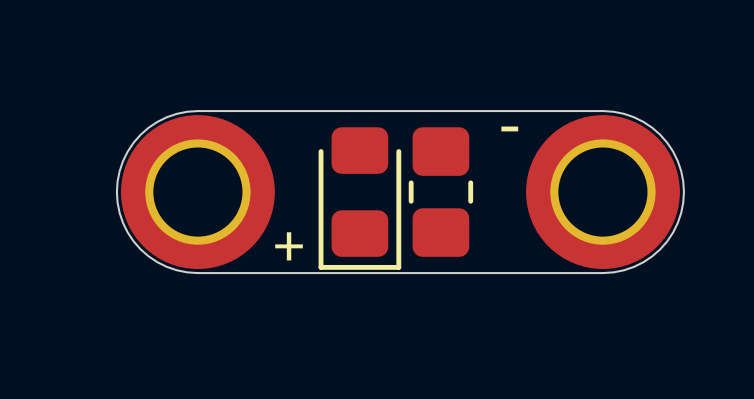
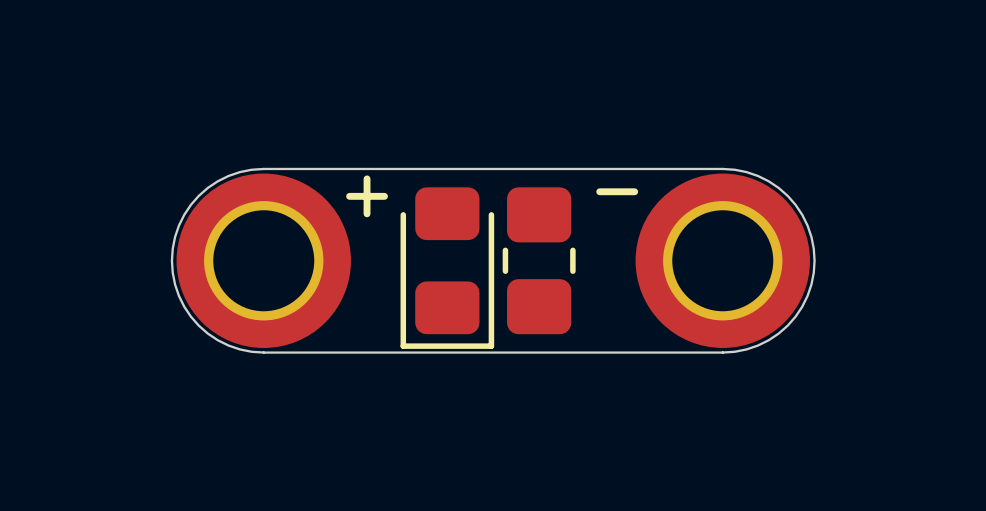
text position: + (289, 246) -> + (367, 196)

